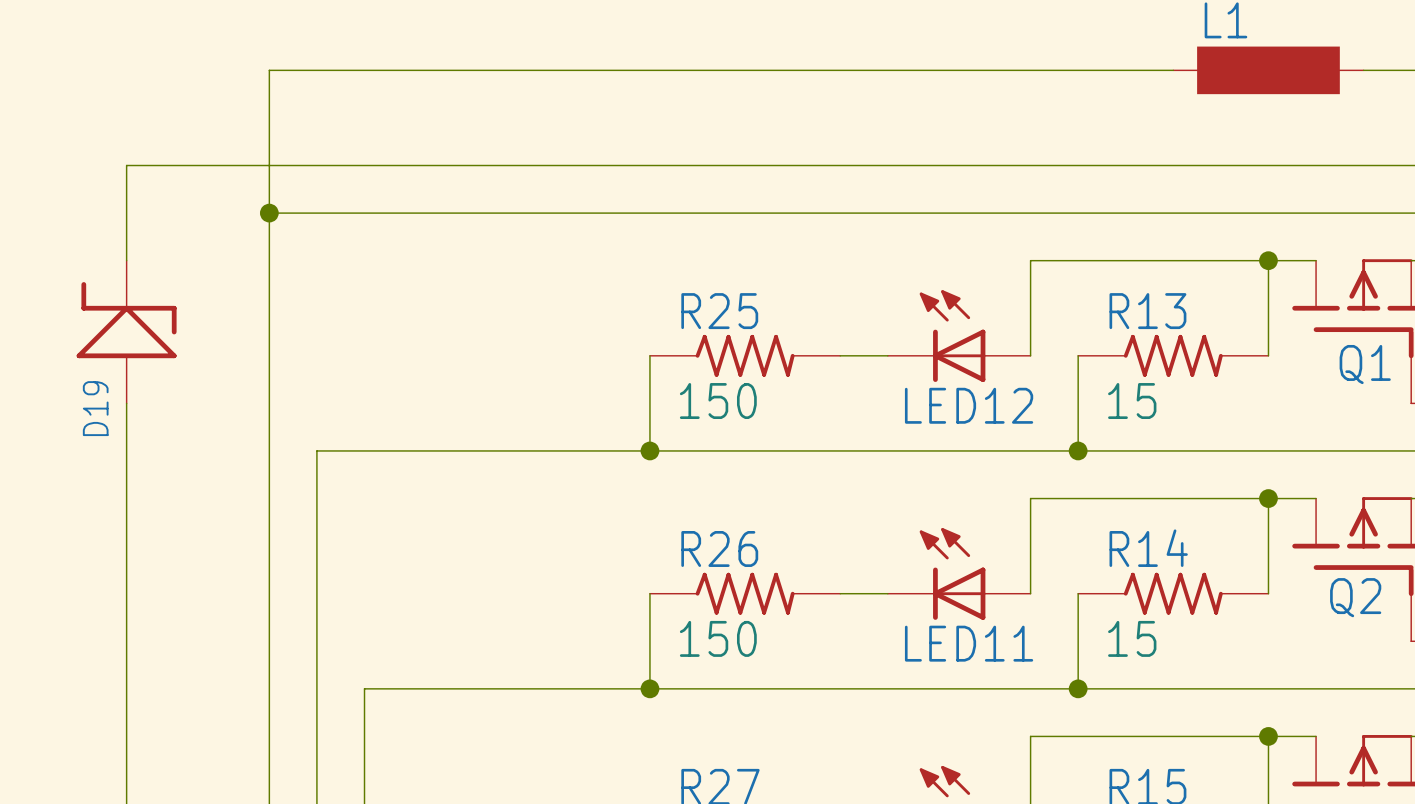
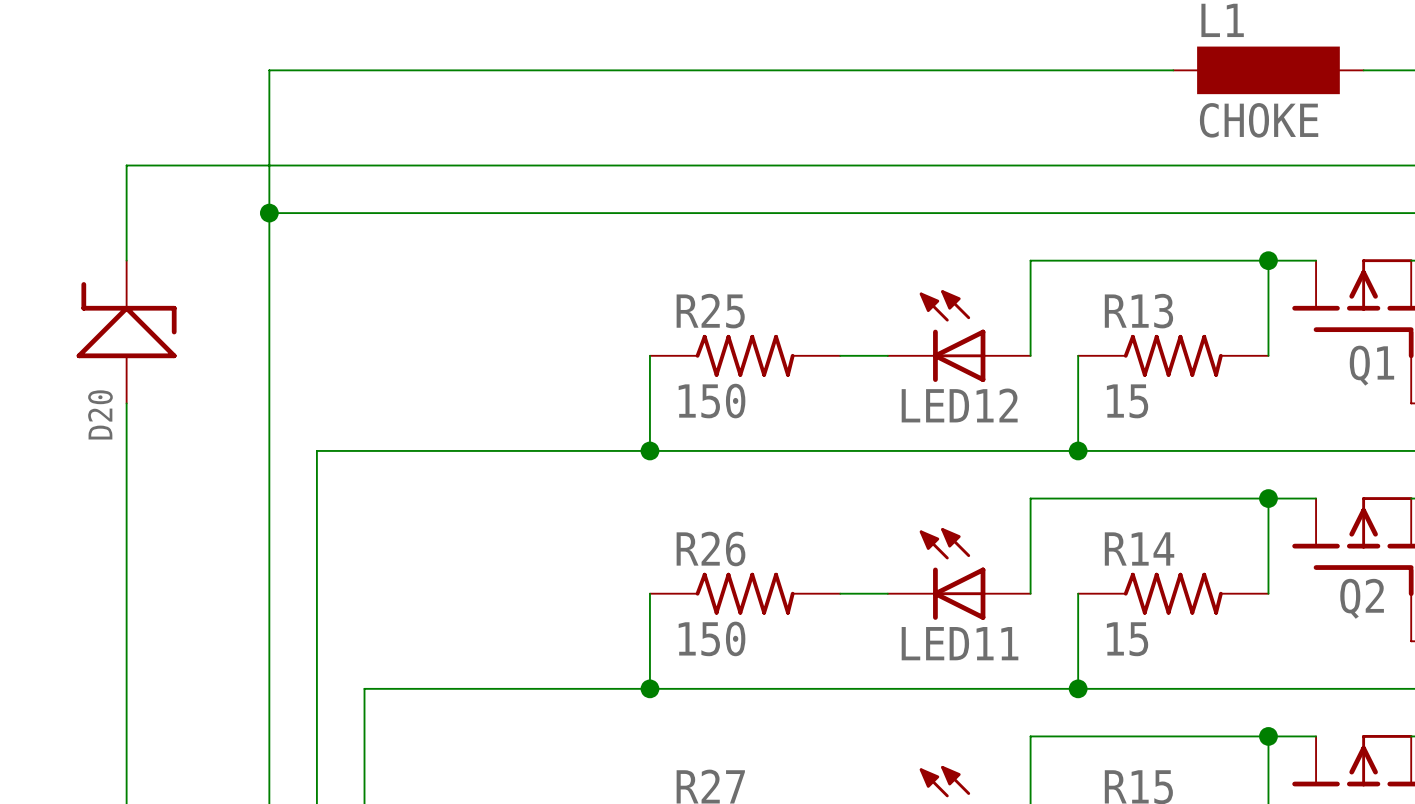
L1 value: none -> CHOKE (1259, 120)
D19 name: D19 (95, 408) -> D20 (100, 414)

